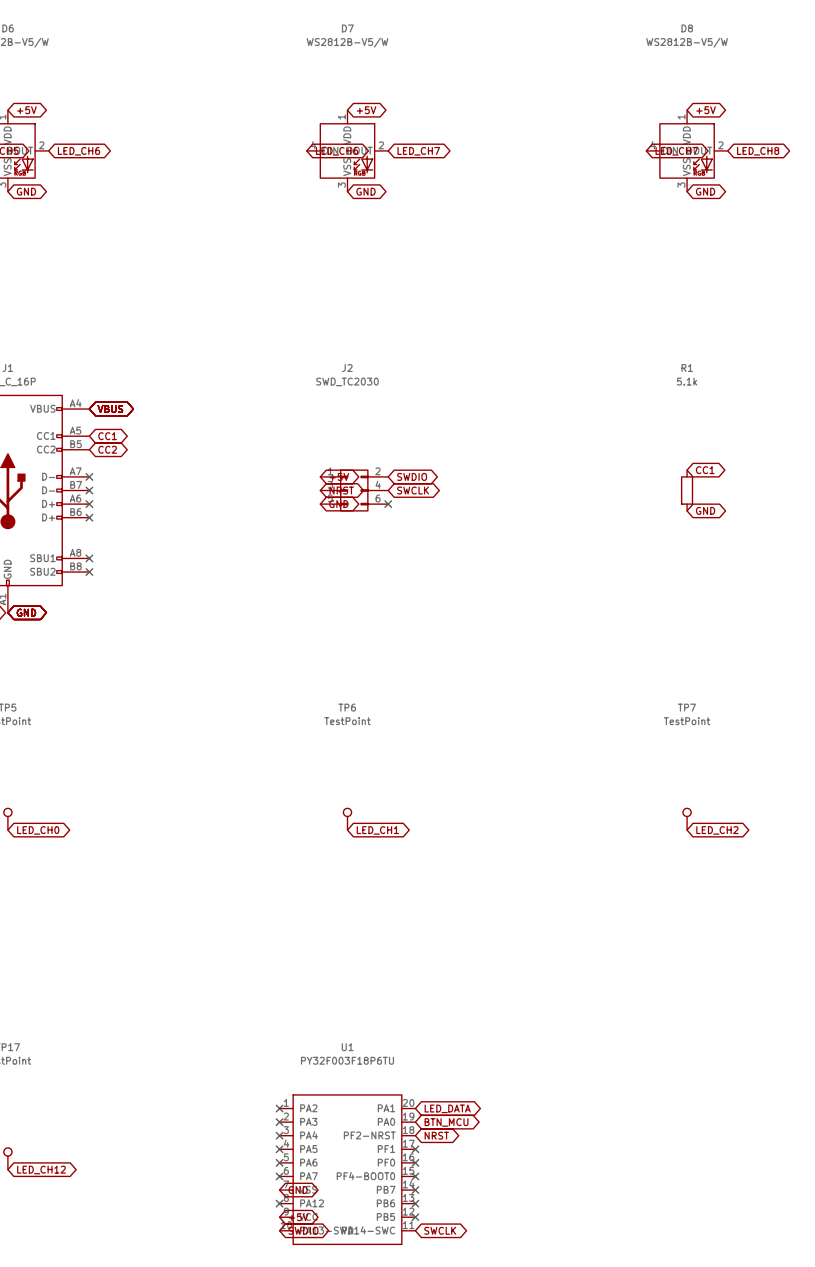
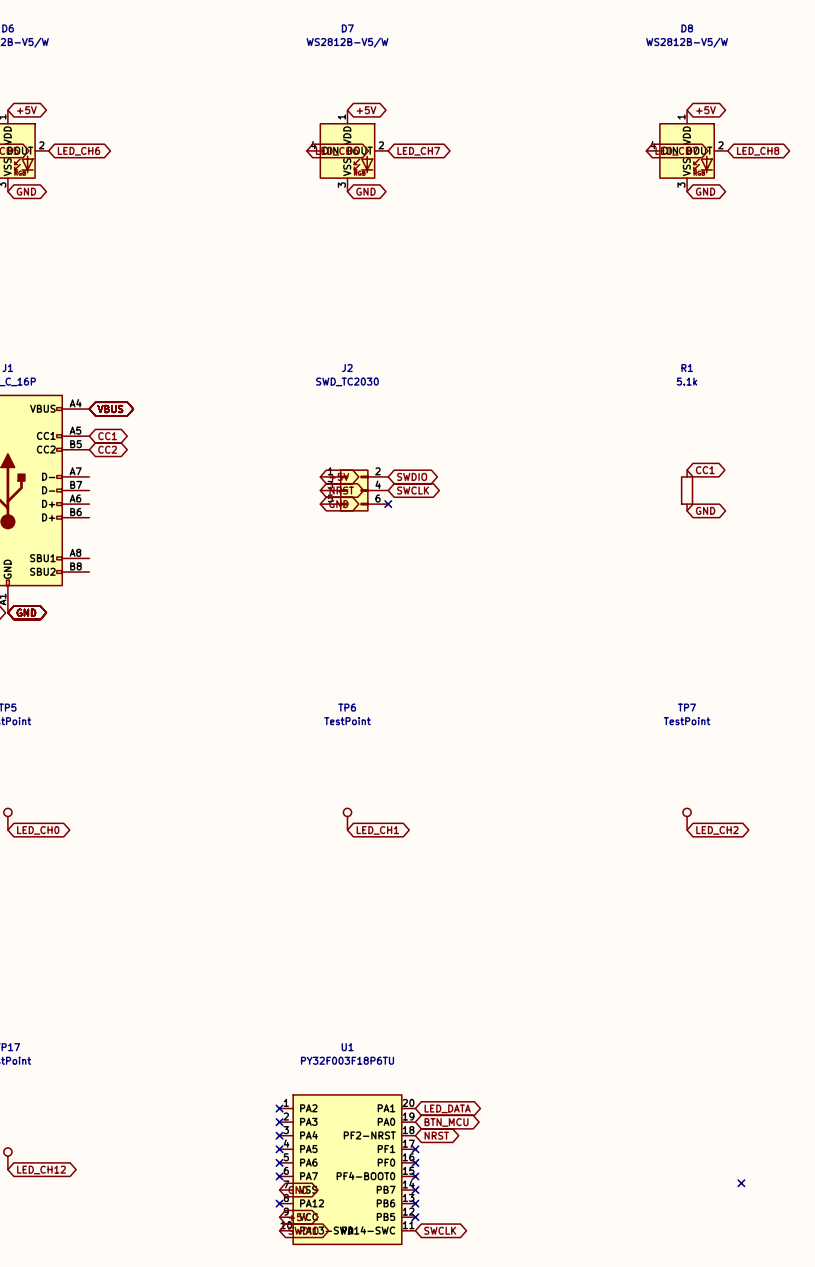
no-connect mark: (89, 476) -> none
no-connect mark: (89, 490) -> none
no-connect mark: (89, 504) -> none
no-connect mark: (89, 517) -> none
no-connect mark: (89, 558) -> none
no-connect mark: (89, 572) -> none
no-connect mark: none -> (741, 1183)

